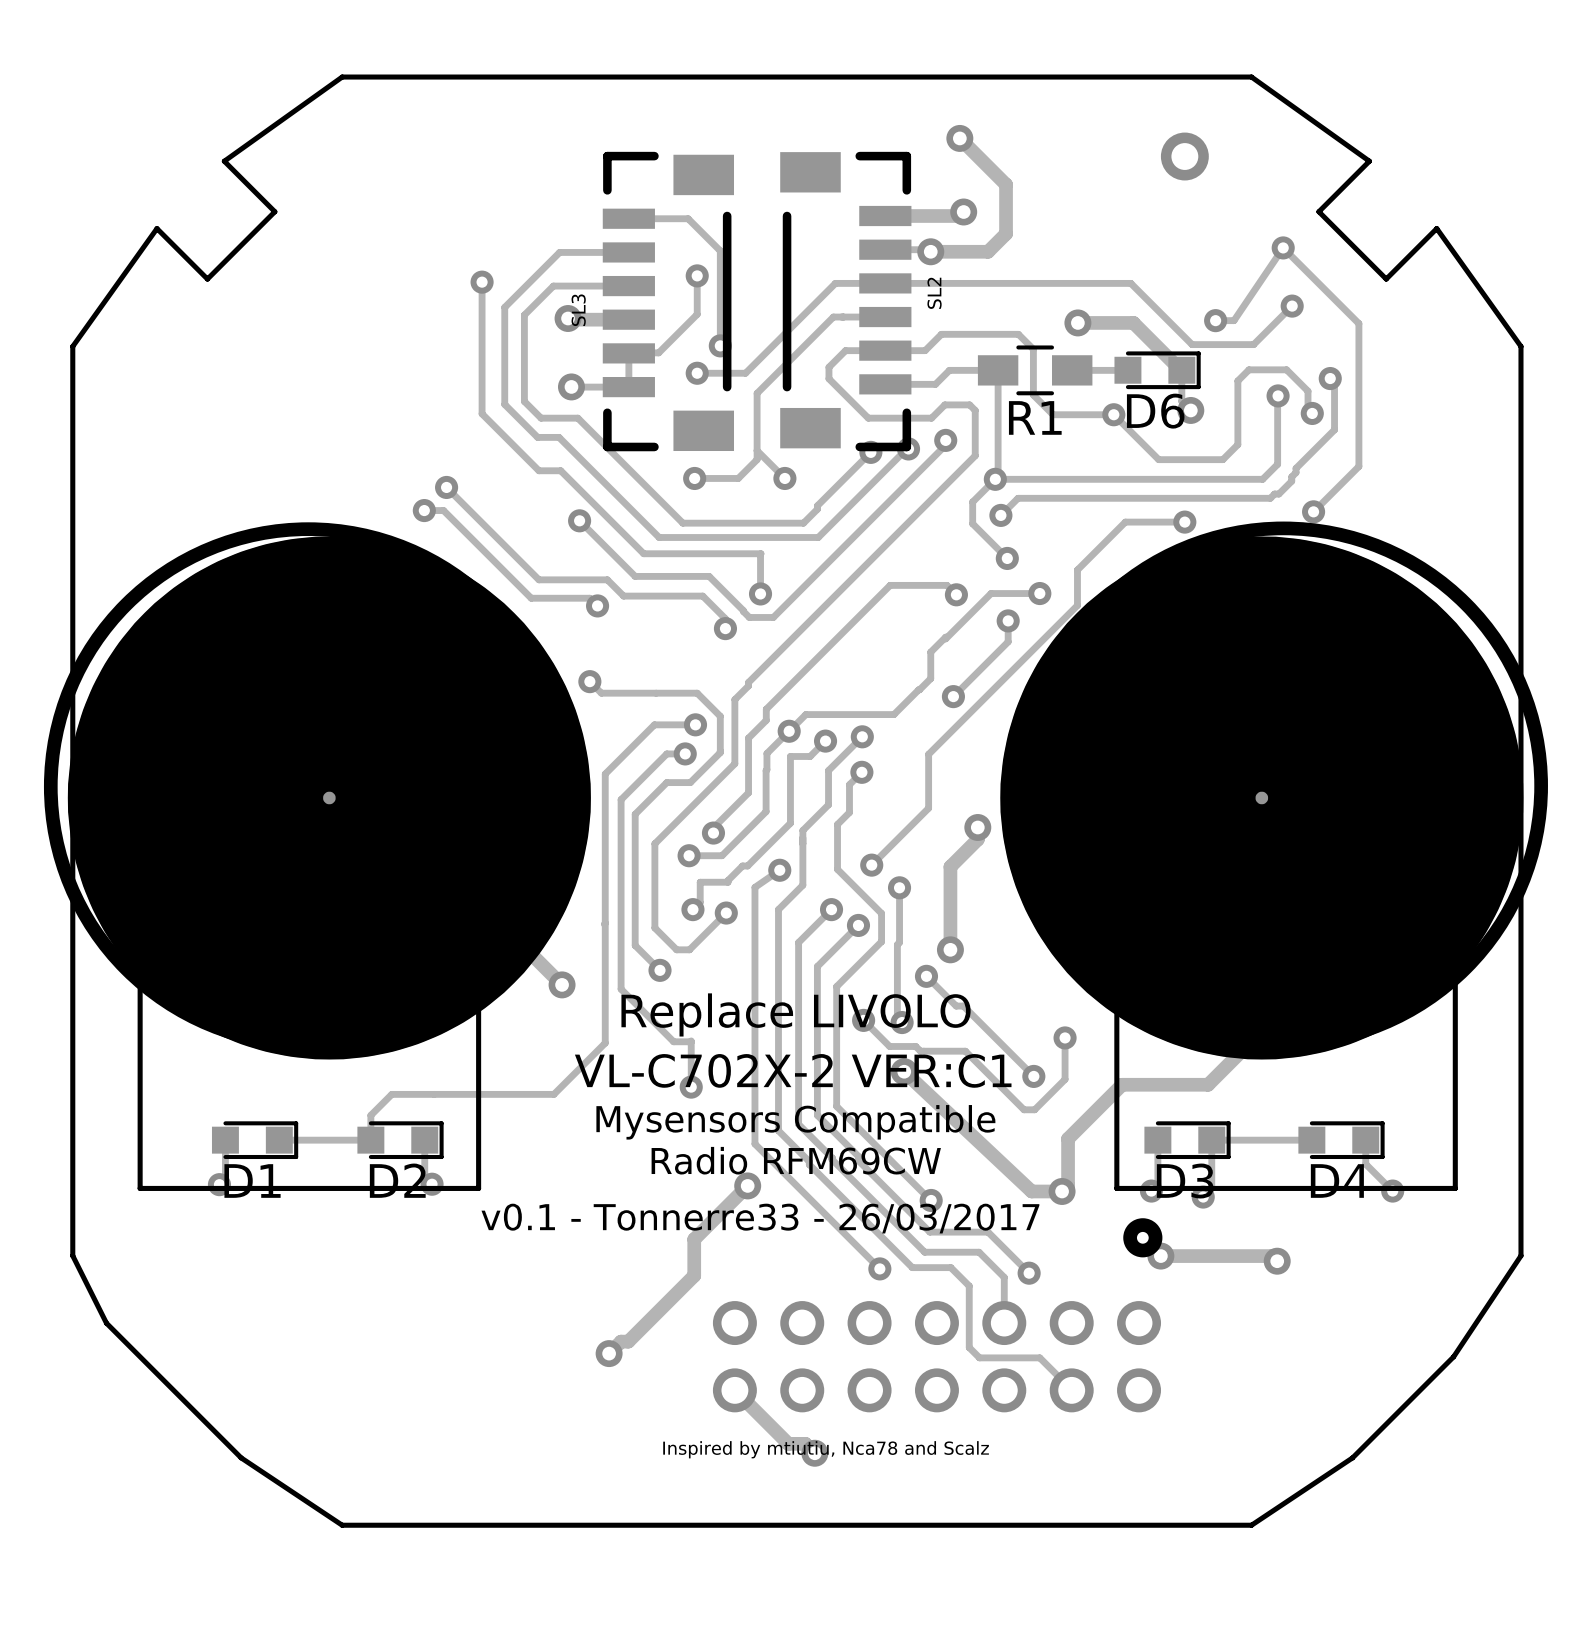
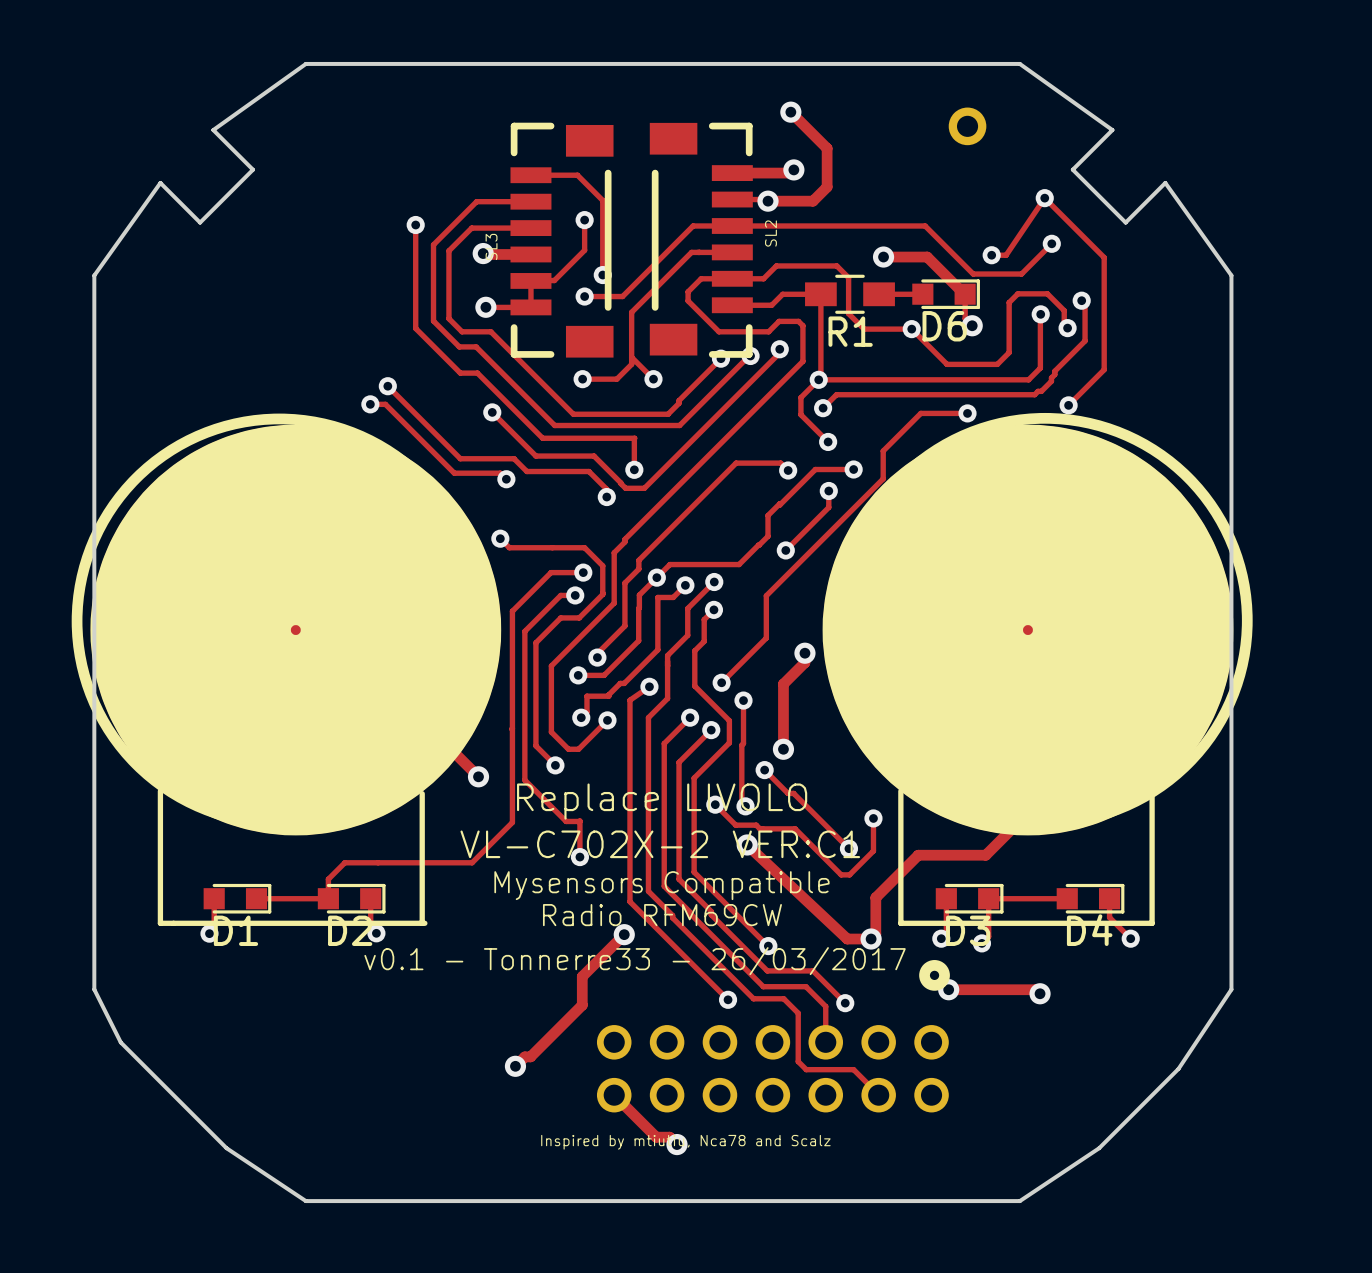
line: (478, 981) (478, 1188) (140, 1188) (140, 983) -> none
line: (1455, 981) (1455, 1188) (1116, 1188) (1116, 983) -> none
line: none -> (160, 791) (160, 923) (424, 923)
line: none -> (900, 791) (900, 923) (1152, 923) (1152, 791)
line: none -> (422, 793) (422, 923)

